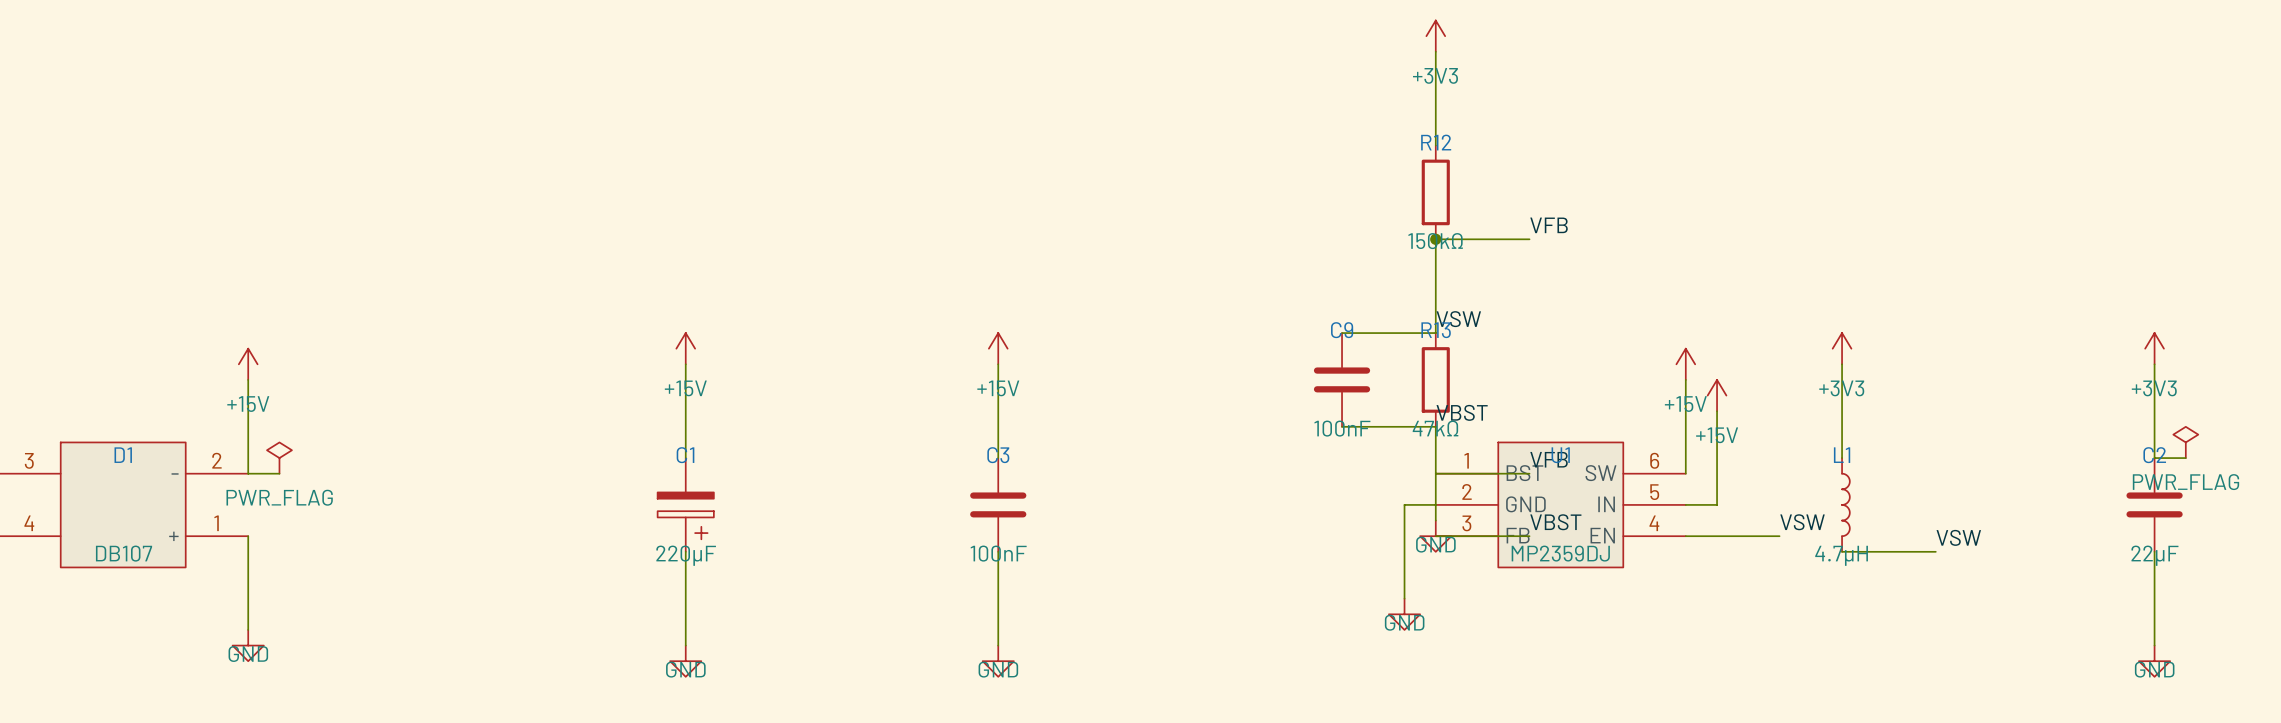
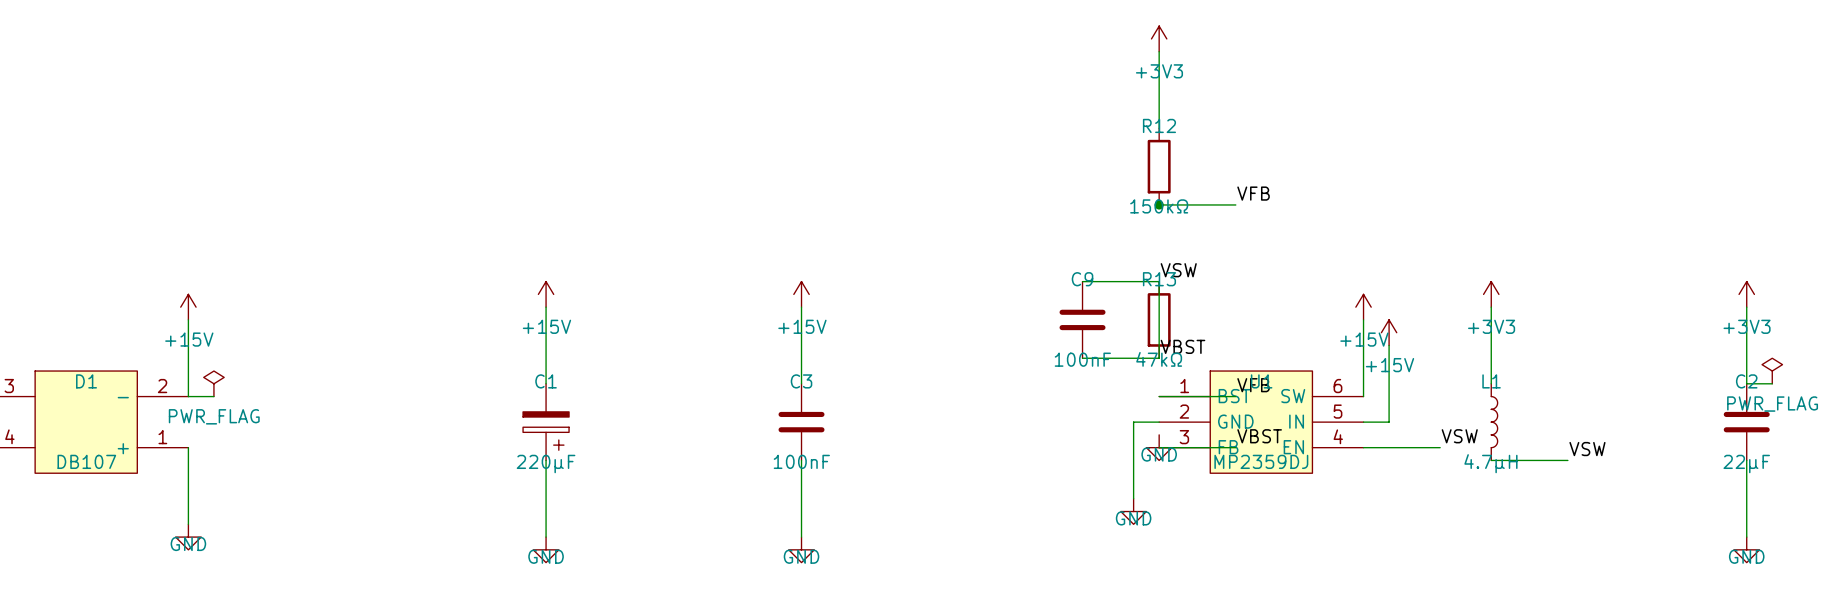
wire: (1435, 239) (1435, 333) -> (1159, 358) (1159, 281)
wire: (1435, 426) (1435, 520) -> none

